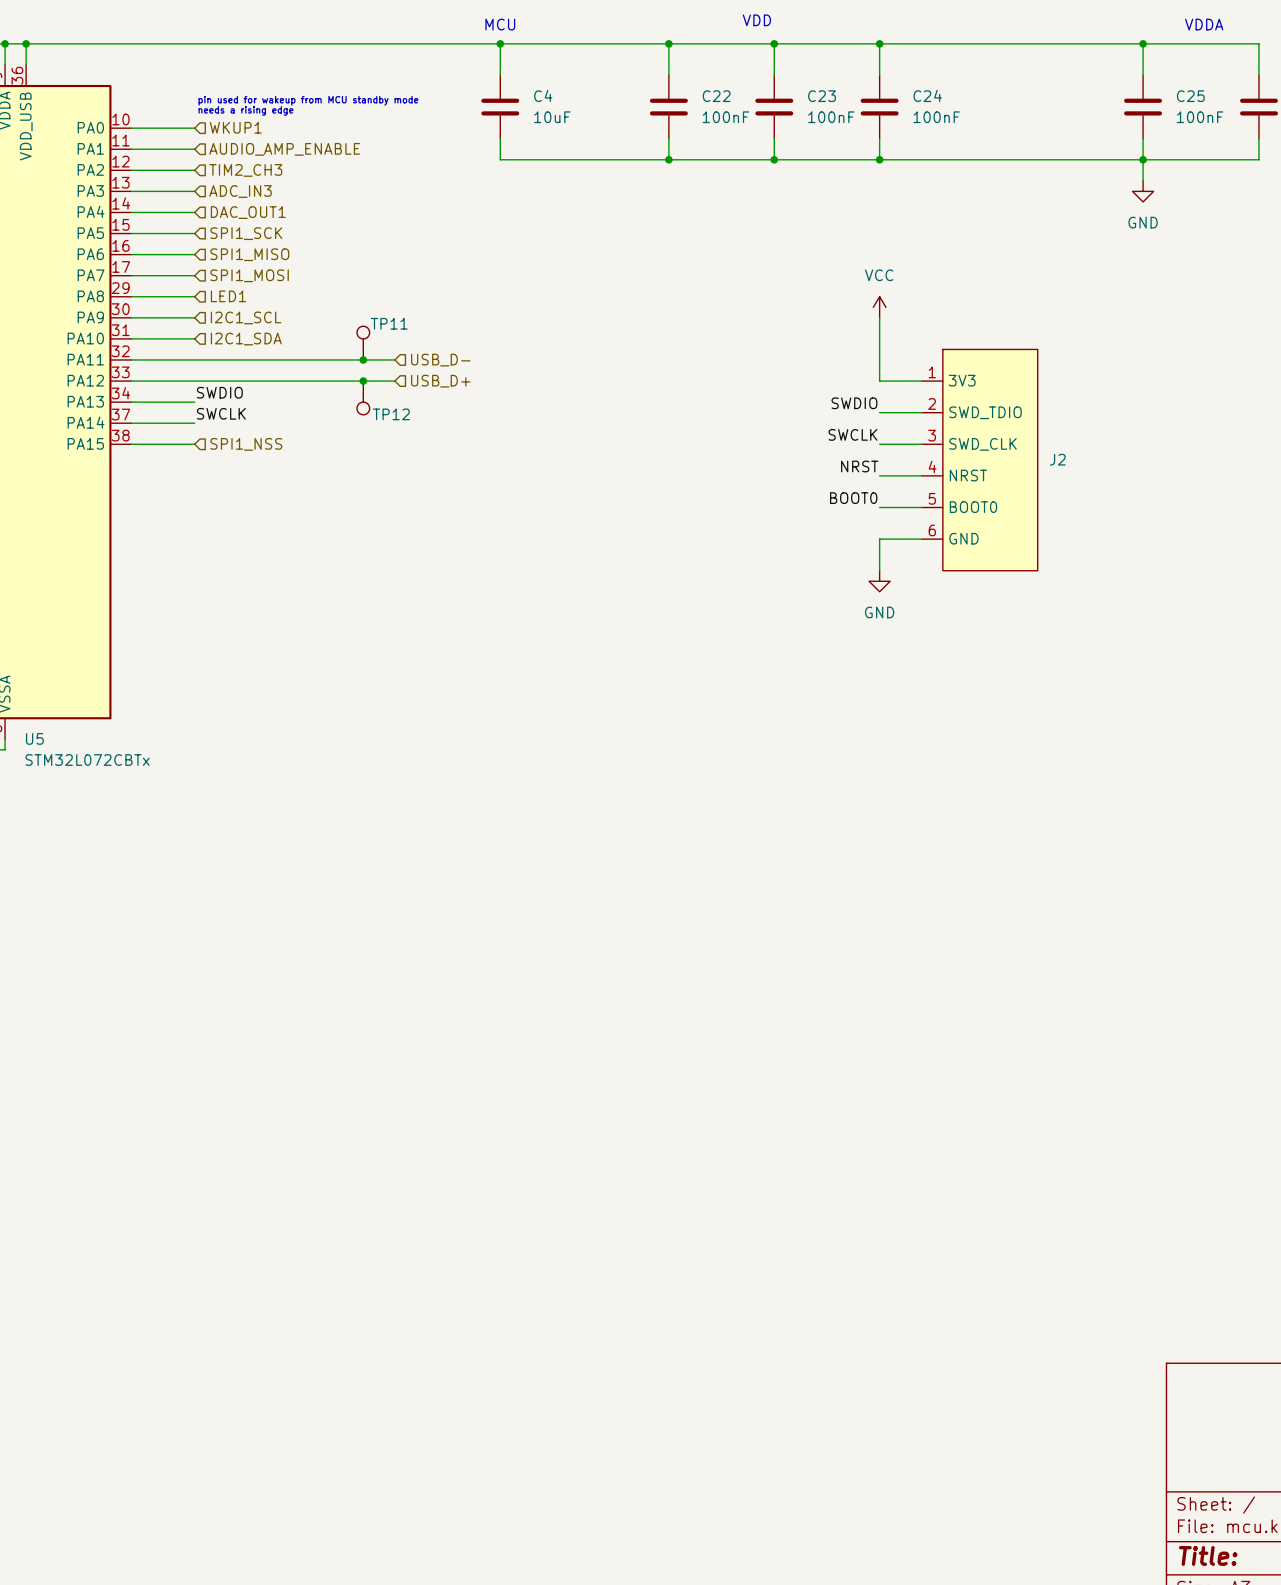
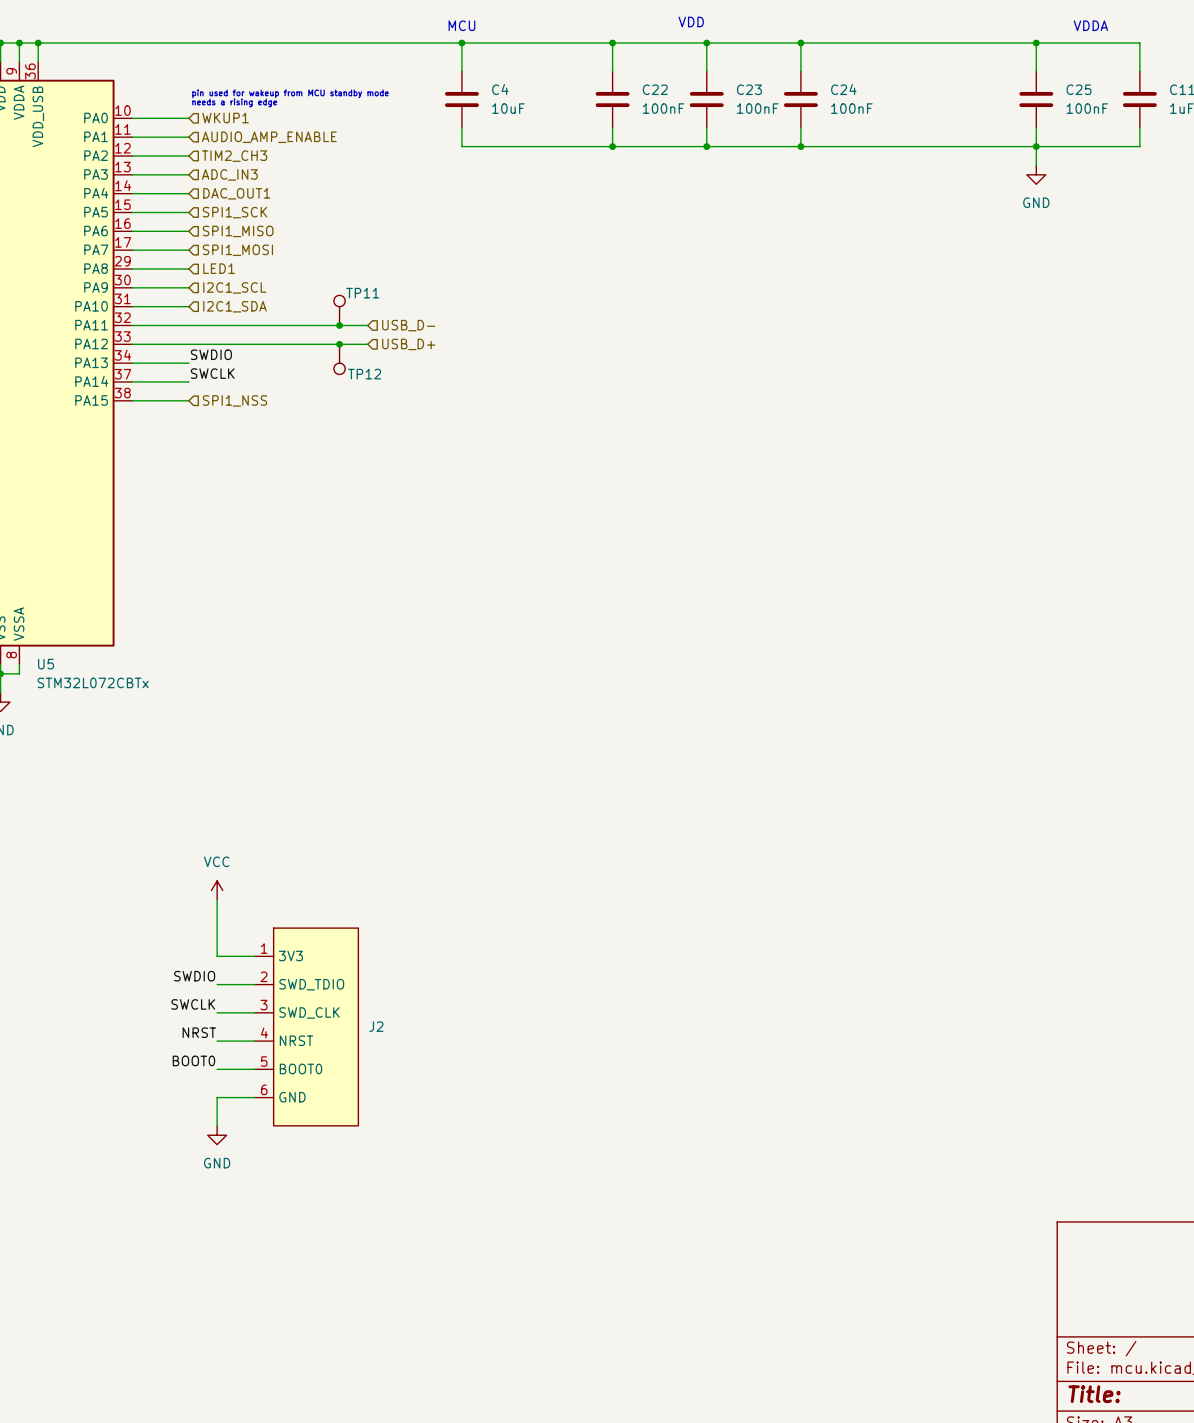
power symbol: VCC (879, 307) -> none
wire: (879, 317) (879, 381) (921, 381) -> none
label: SWDIO (854, 403) -> none
wire: (879, 412) (921, 412) -> none
label: SWCLK (852, 434) -> none
wire: (879, 444) (921, 444) -> none
J2 position: (979, 460) -> (306, 1026)
label: NRST (859, 466) -> none
wire: (879, 475) (921, 475) -> none
label: BOOT0 (853, 498) -> none
wire: (879, 507) (921, 507) -> none
wire: (921, 539) (879, 539) (879, 570) -> none
power symbol: GND (879, 581) -> none
power symbol: none -> VCC (217, 890)
wire: none -> (217, 899) (217, 956) (254, 956)
label: none -> SWDIO (194, 976)
wire: none -> (217, 984) (254, 984)
label: none -> SWCLK (193, 1004)
wire: none -> (217, 1012) (254, 1012)
label: none -> NRST (199, 1032)
wire: none -> (217, 1041) (254, 1041)
label: none -> BOOT0 (193, 1060)
wire: none -> (217, 1069) (254, 1069)
wire: none -> (254, 1097) (217, 1097) (217, 1125)
power symbol: none -> GND (217, 1135)

